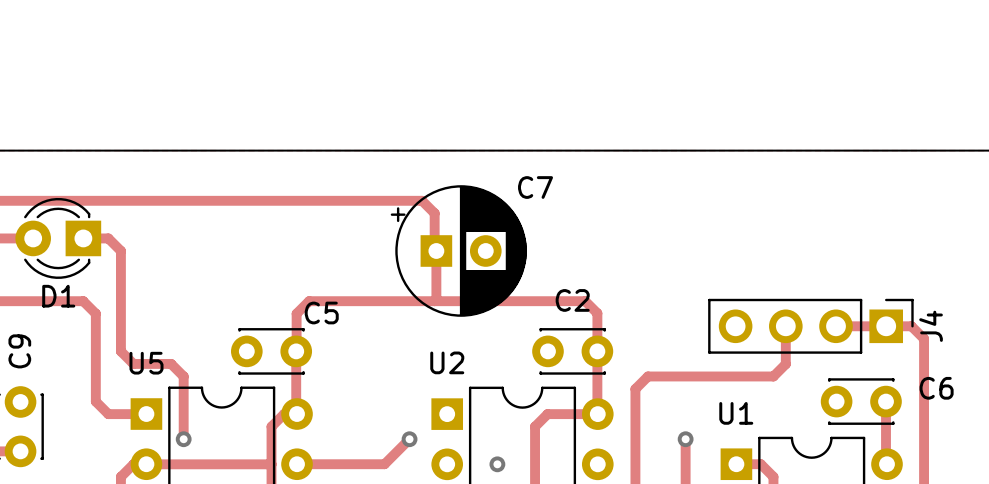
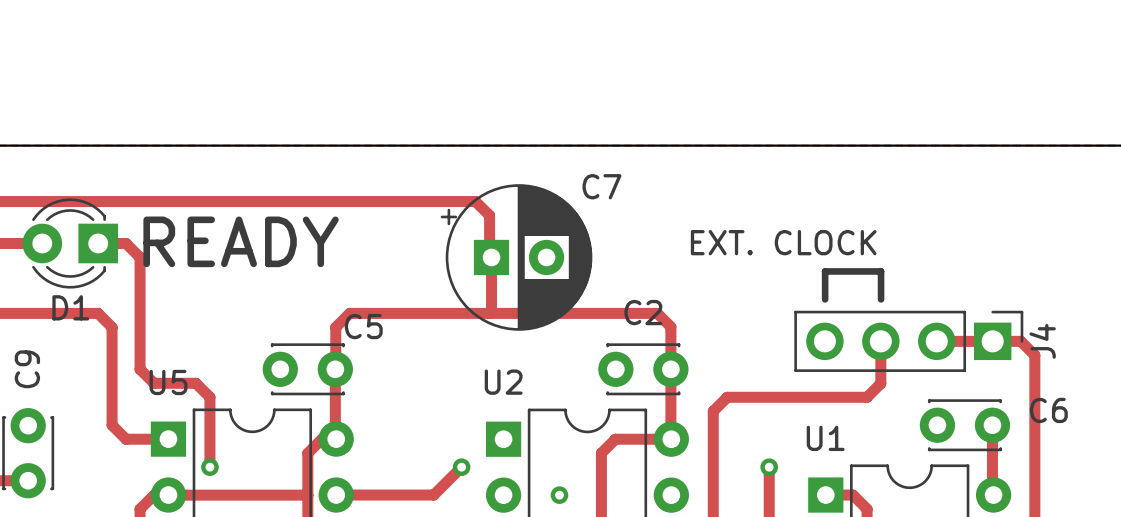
text: none -> READY (241, 241)
text: none -> EXT. CLOCK (783, 242)
line: none -> (825, 299) (825, 271) (881, 271) (881, 299)

